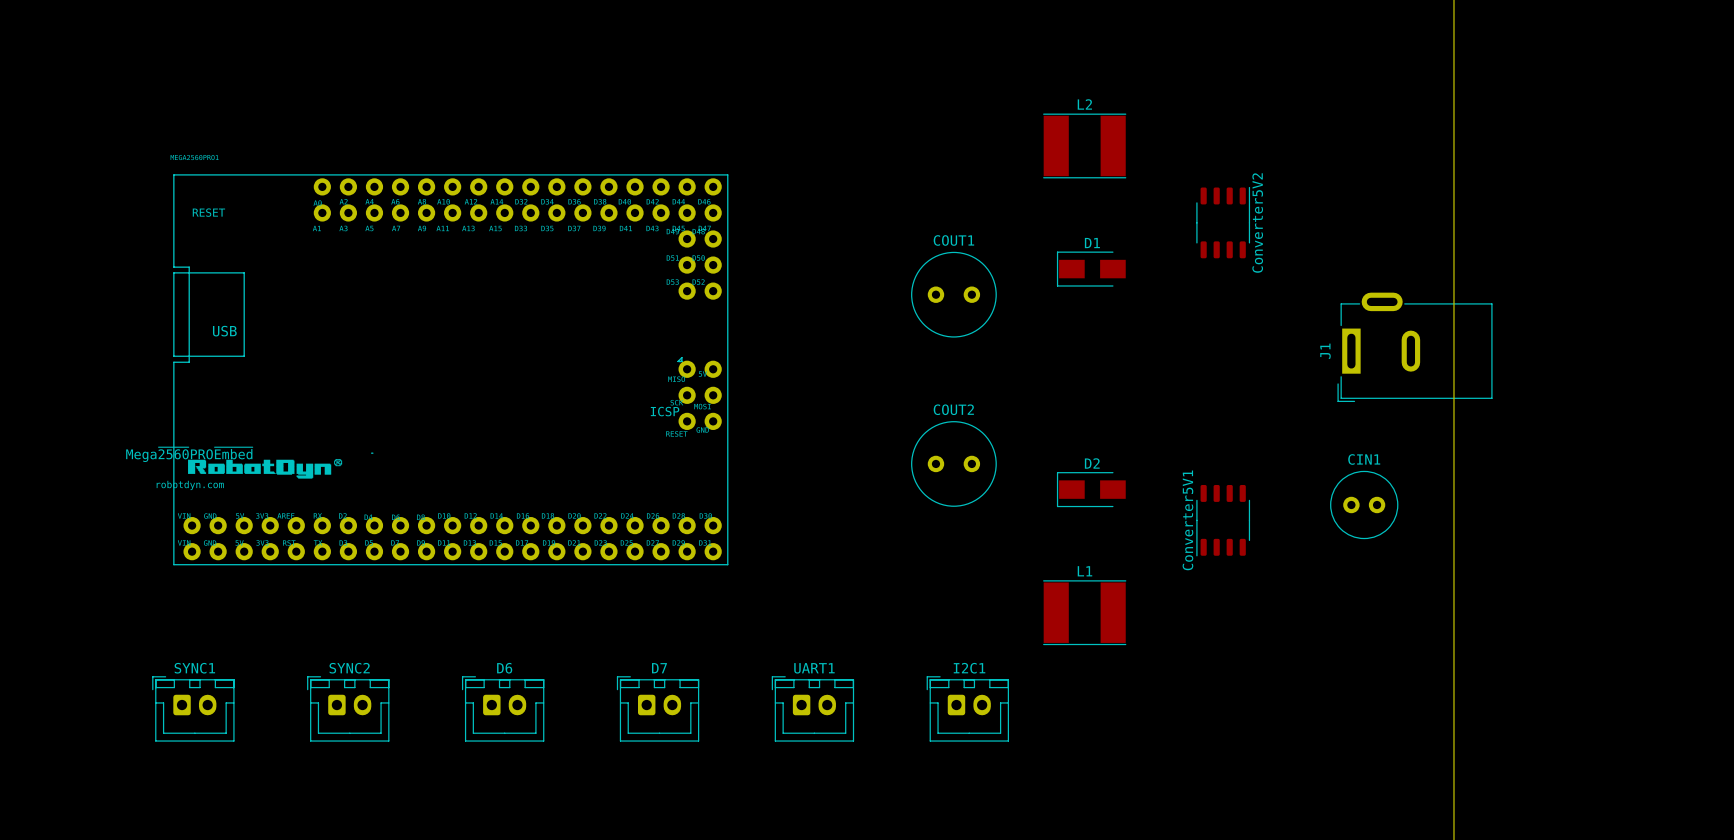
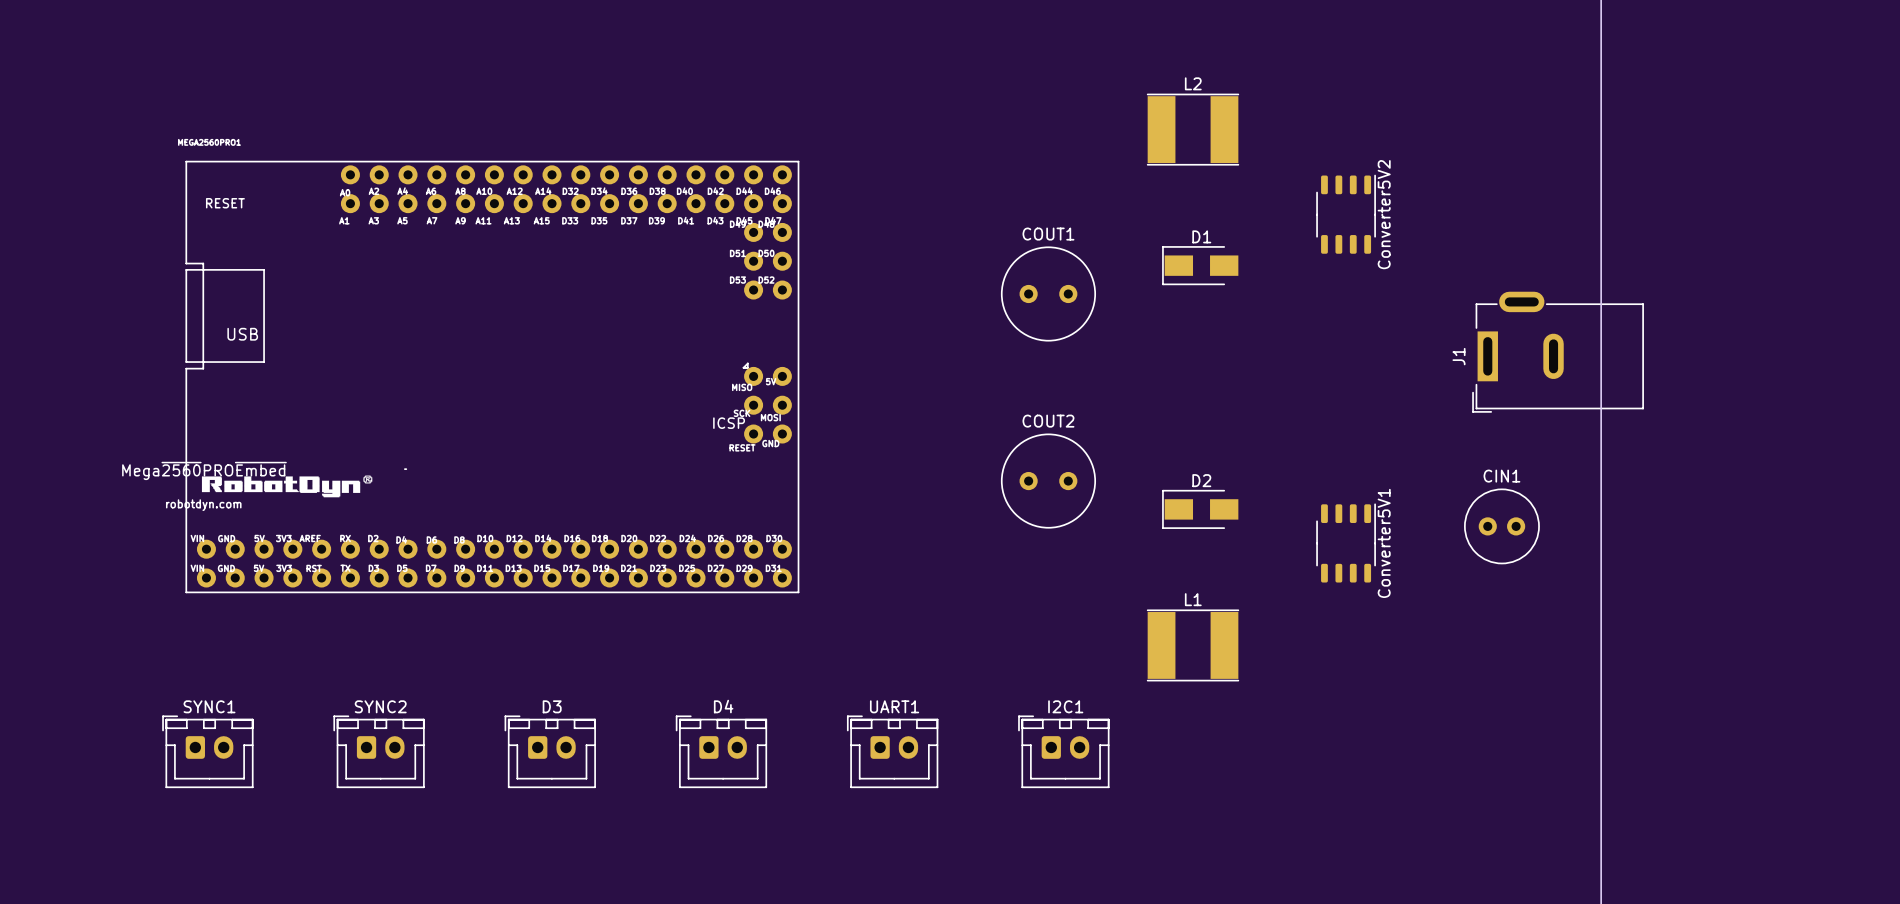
Converter5V1 rotation: 0° (1223, 520) -> 180° (1346, 543)
D6 name: D6 (504, 668) -> D3 (552, 706)
D7 name: D7 (659, 668) -> D4 (723, 706)

